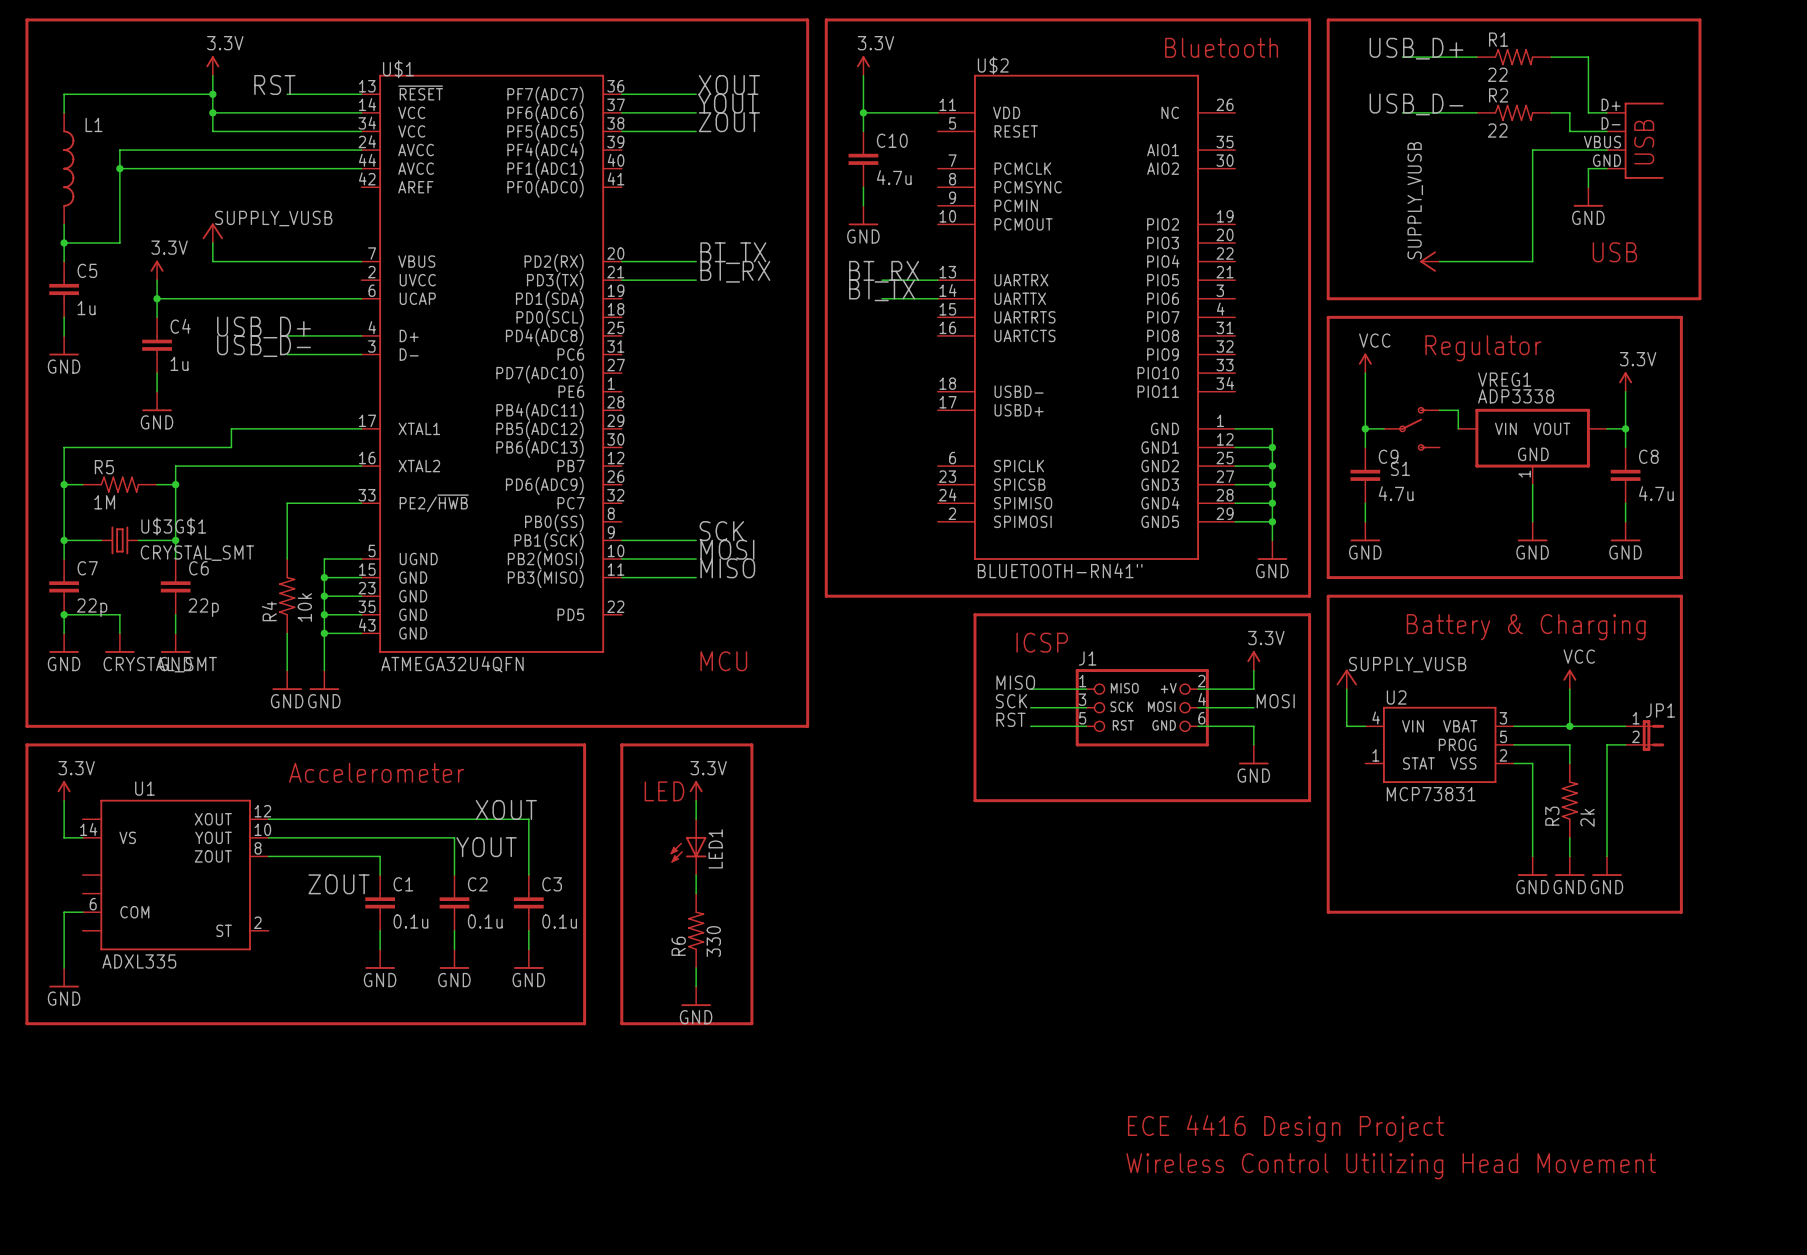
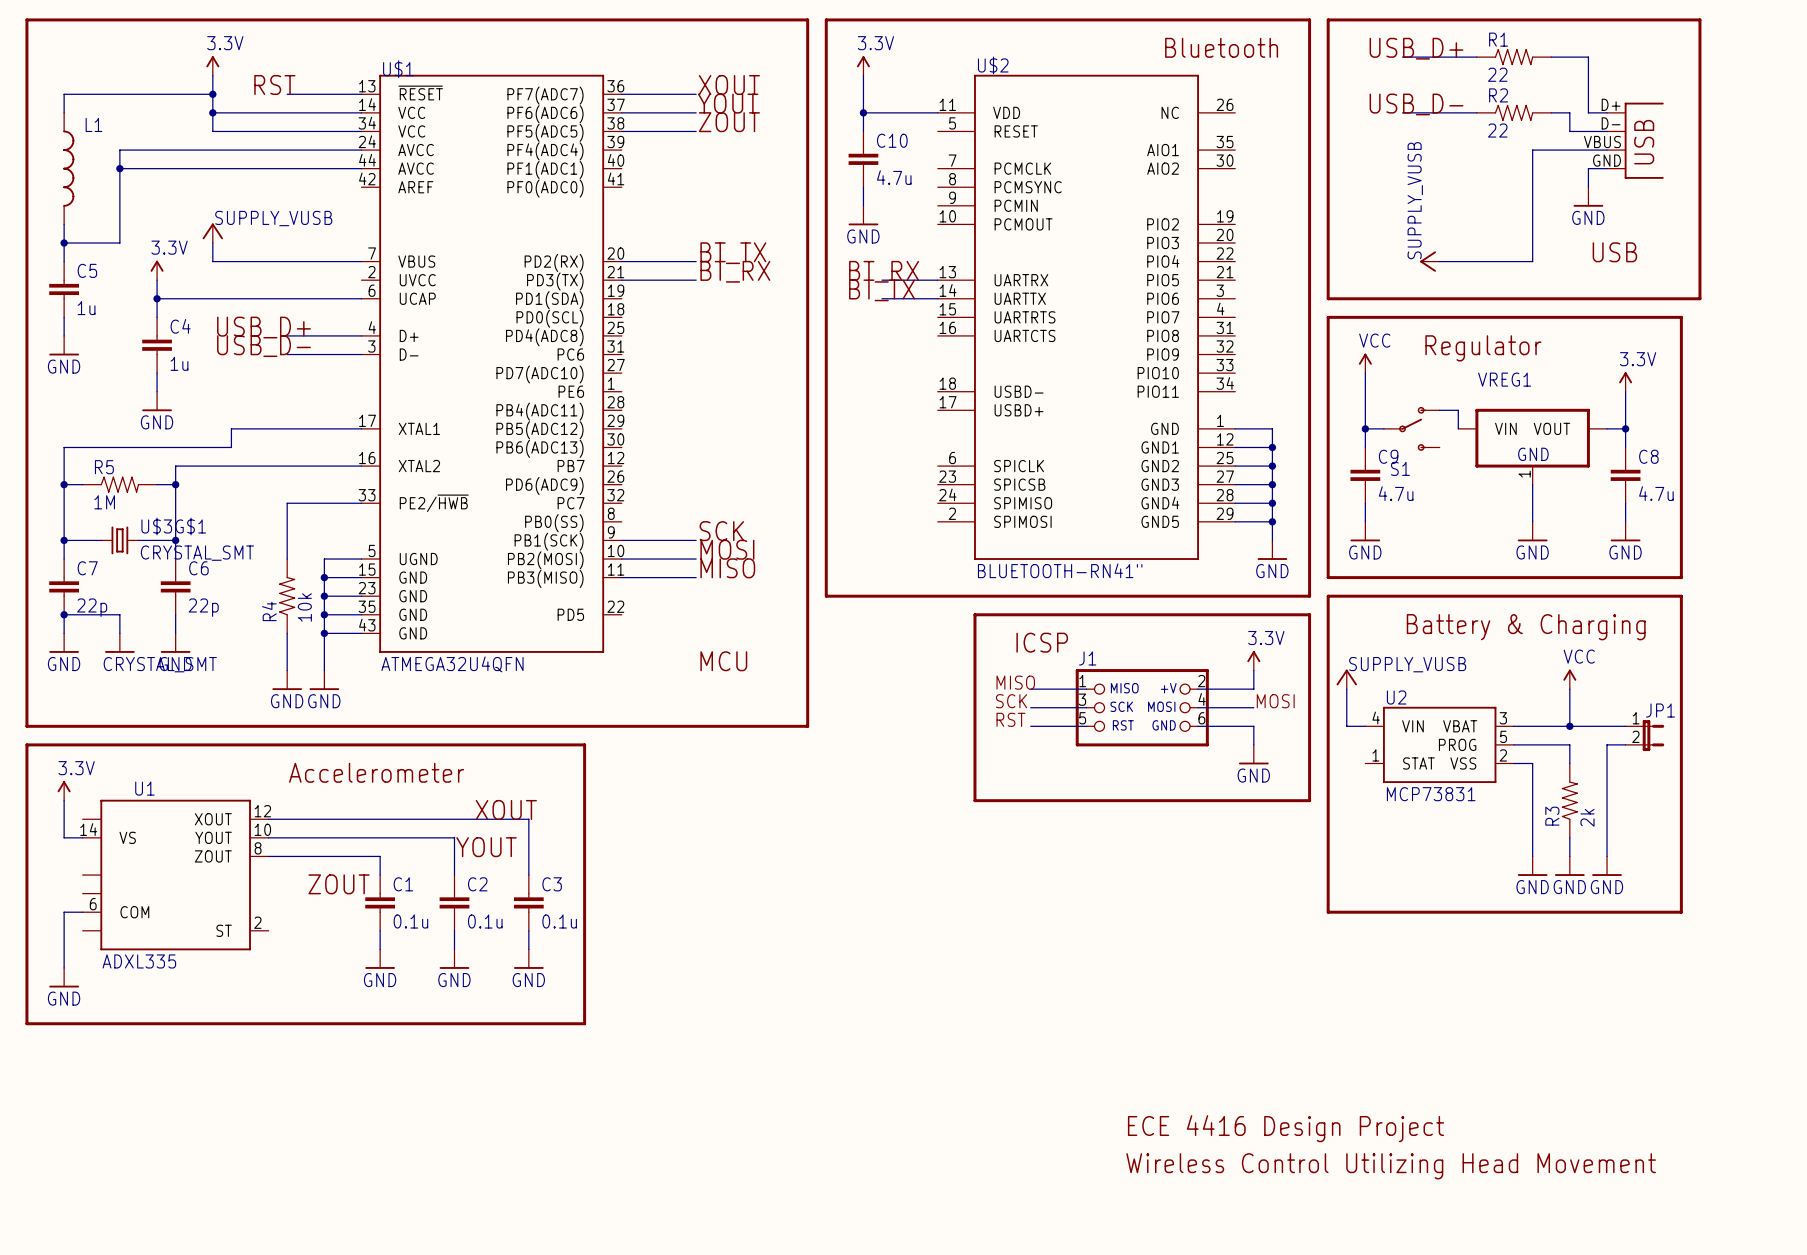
VREG1 value: ADP3338 (1516, 396) -> none
line: (621, 744) (751, 744) (751, 1023) (621, 1023) (621, 744) -> none
power symbol: 3.3V (696, 790) -> none
text: LED (664, 791) -> none
wire: (696, 800) (696, 819) -> none
LED1: (688, 847) -> none
wire: (696, 875) (696, 893) -> none
R6: 330 (696, 930) -> none
wire: (696, 967) (696, 986) -> none
power symbol: GND (696, 996) -> none

